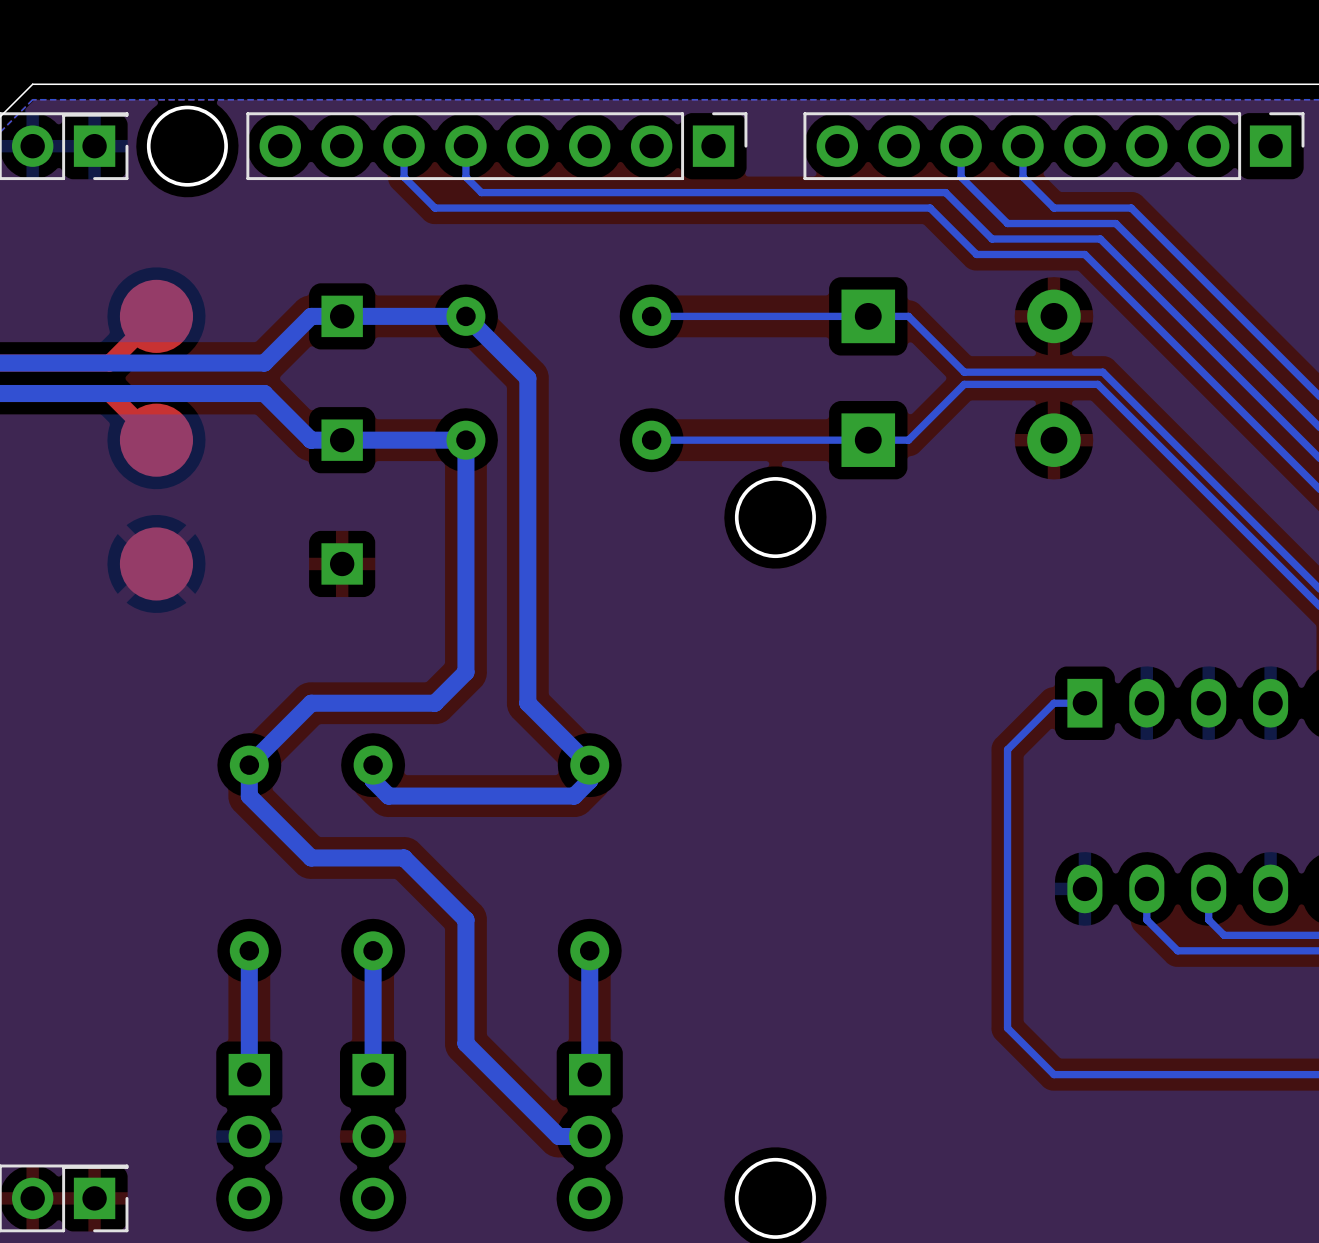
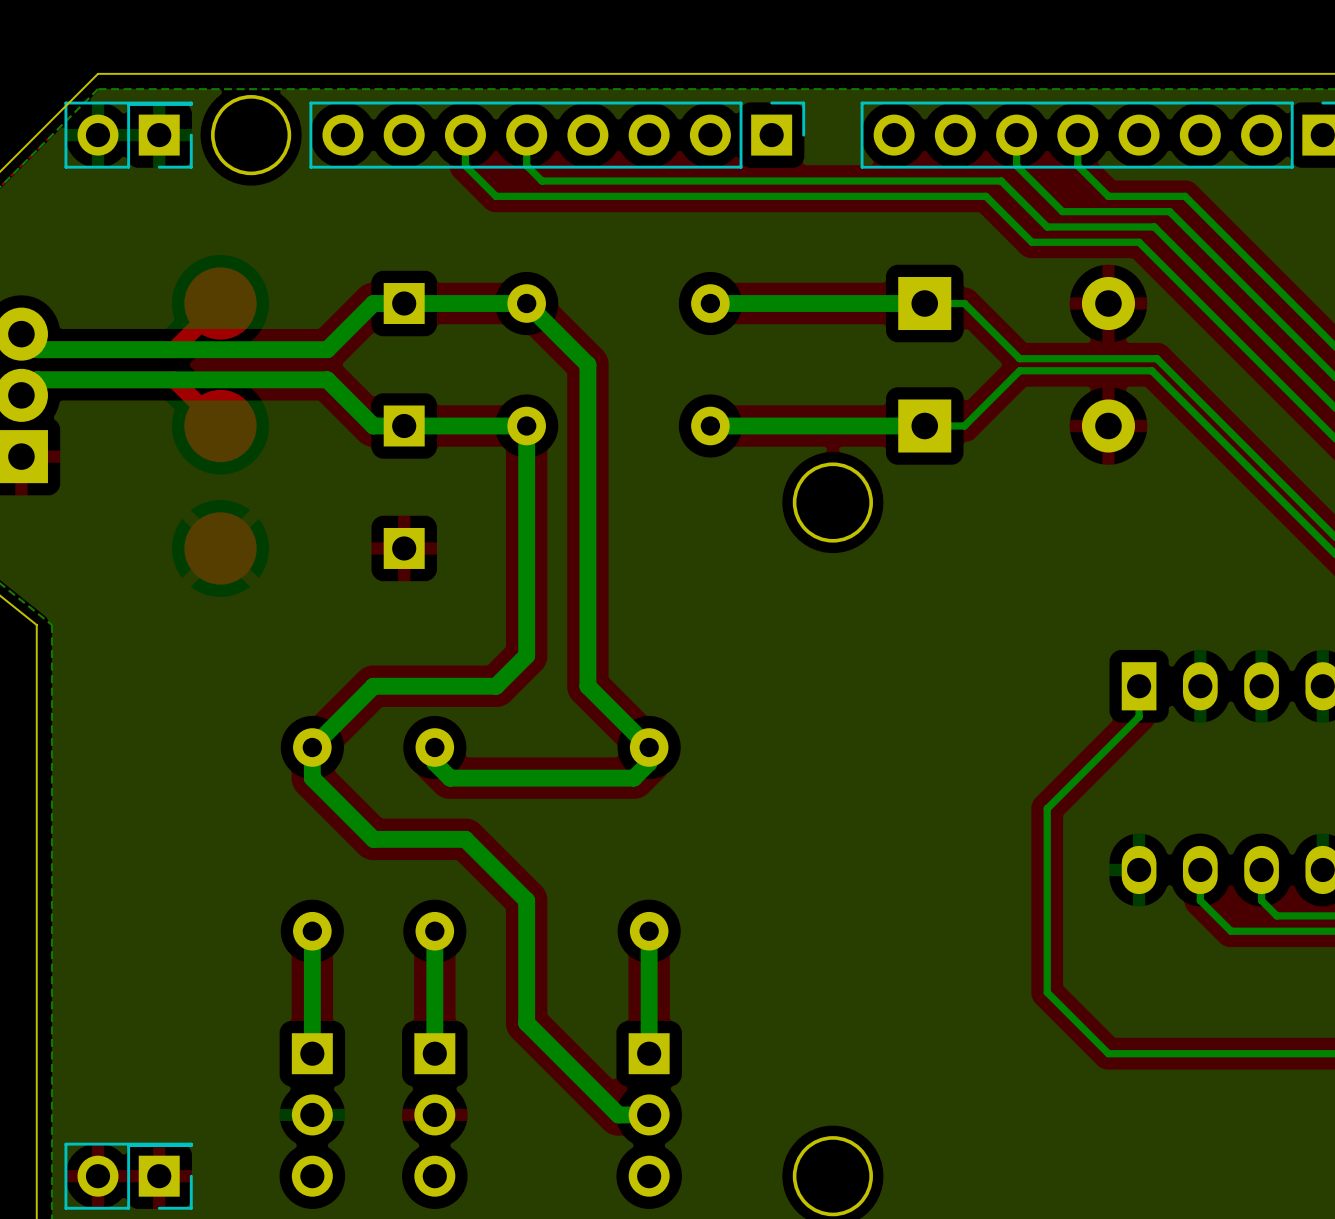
bottom track width: thin (868, 316) (651, 316) -> thick (924, 303) (710, 303)
bottom track width: thin (868, 440) (651, 440) -> thick (924, 425) (710, 425)
bottom track: (1084, 703) (1053, 703) (1007, 749) (1007, 1028) -> (1139, 686) (1139, 716) (1047, 808) (1047, 992) (1062, 1007)

